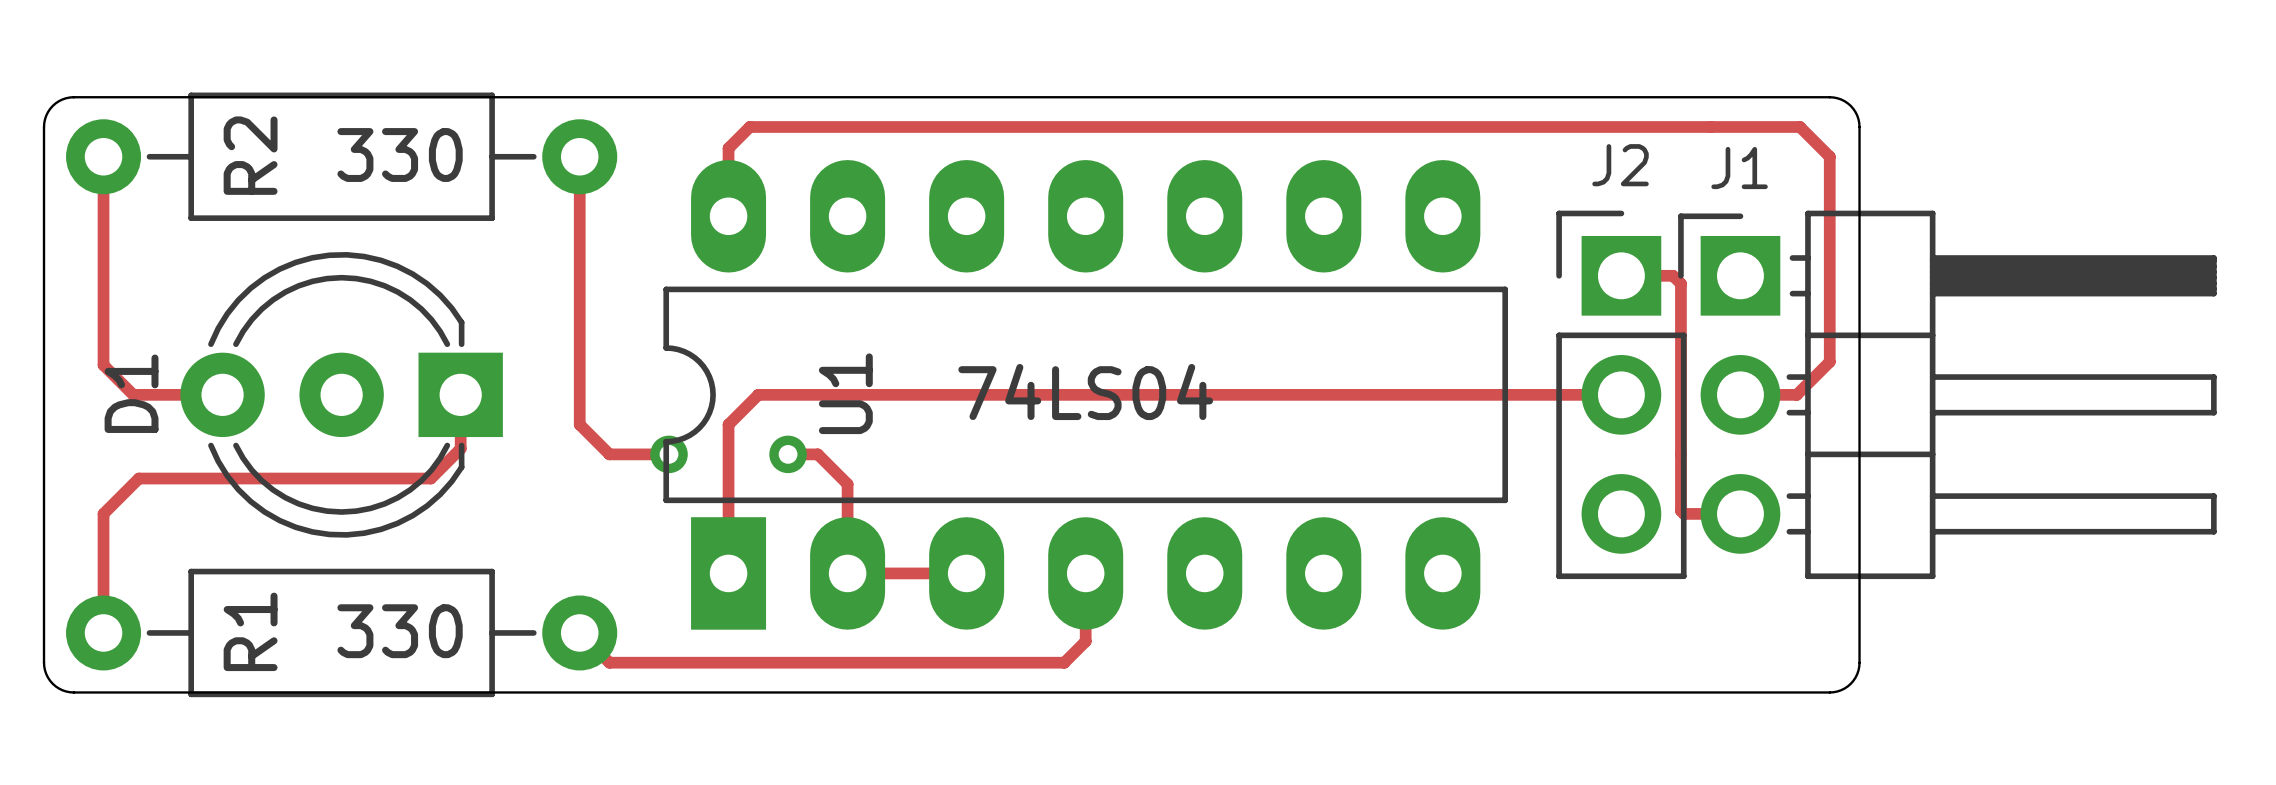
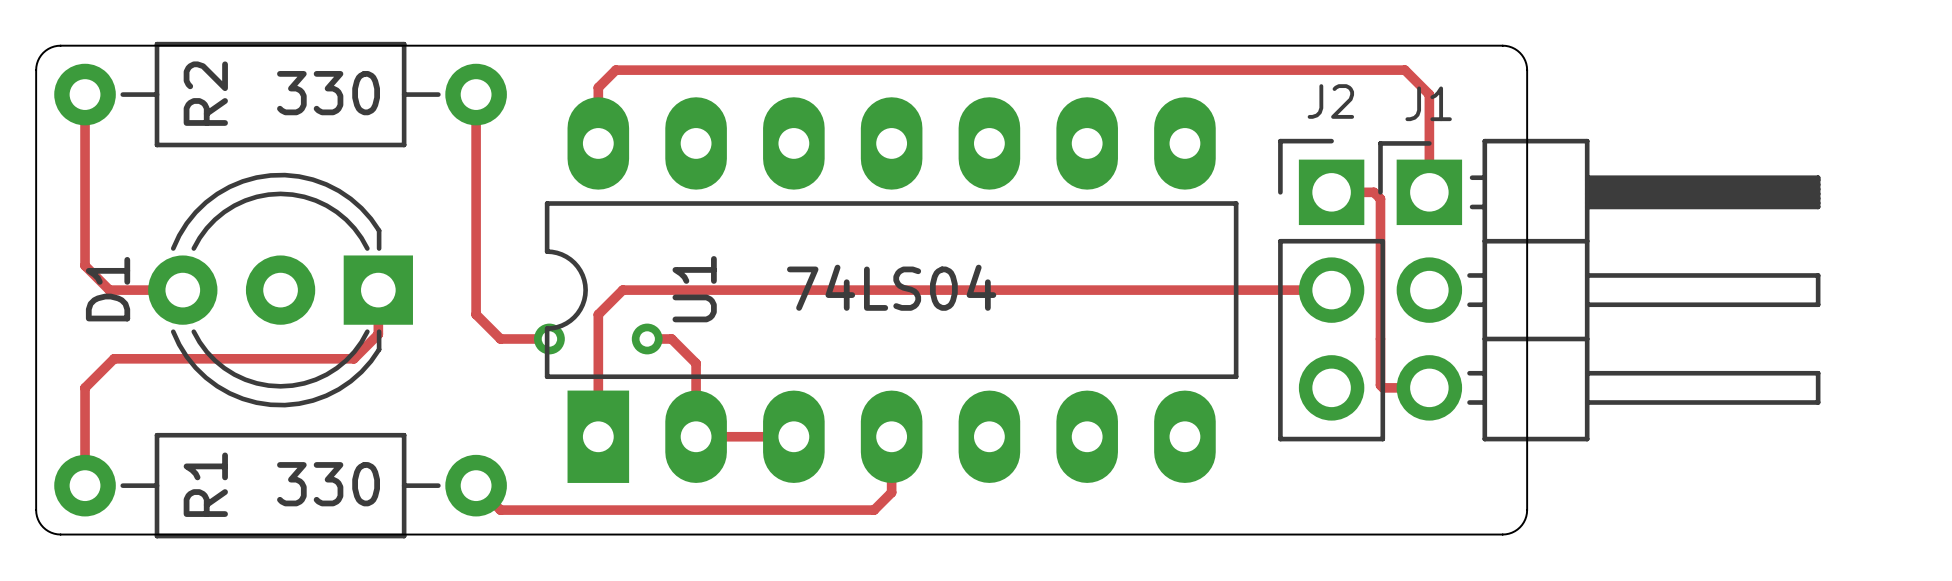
track: (1710, 126) (1799, 126) (1829, 156) (1829, 361) (1796, 394) (1740, 394) -> (1404, 70) (1429, 94) (1429, 192)

